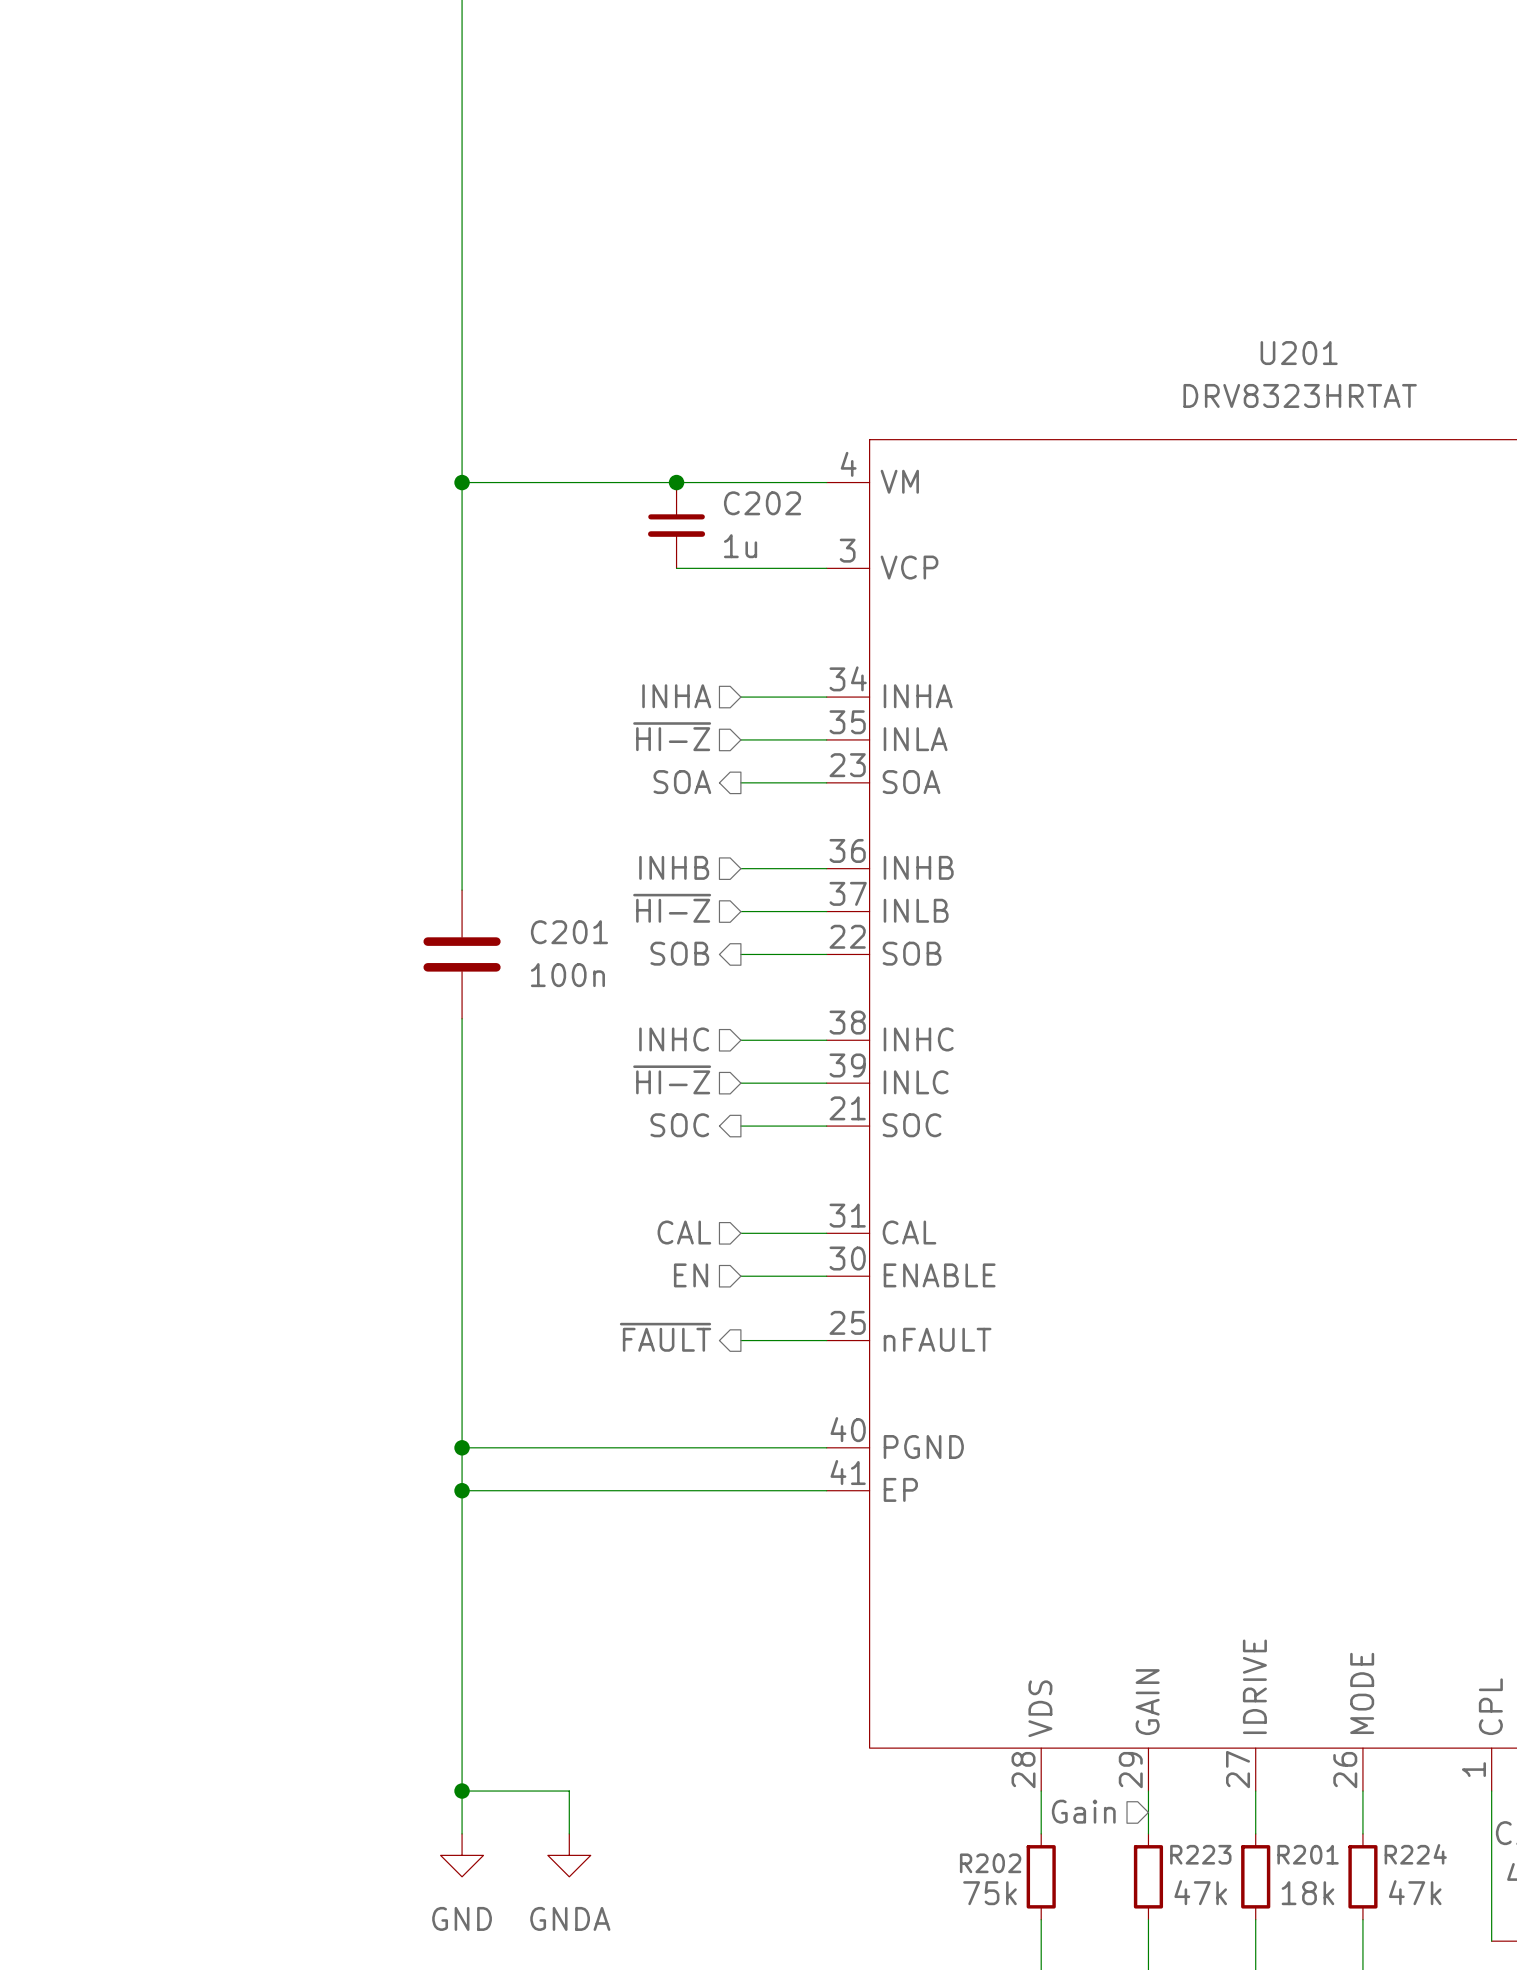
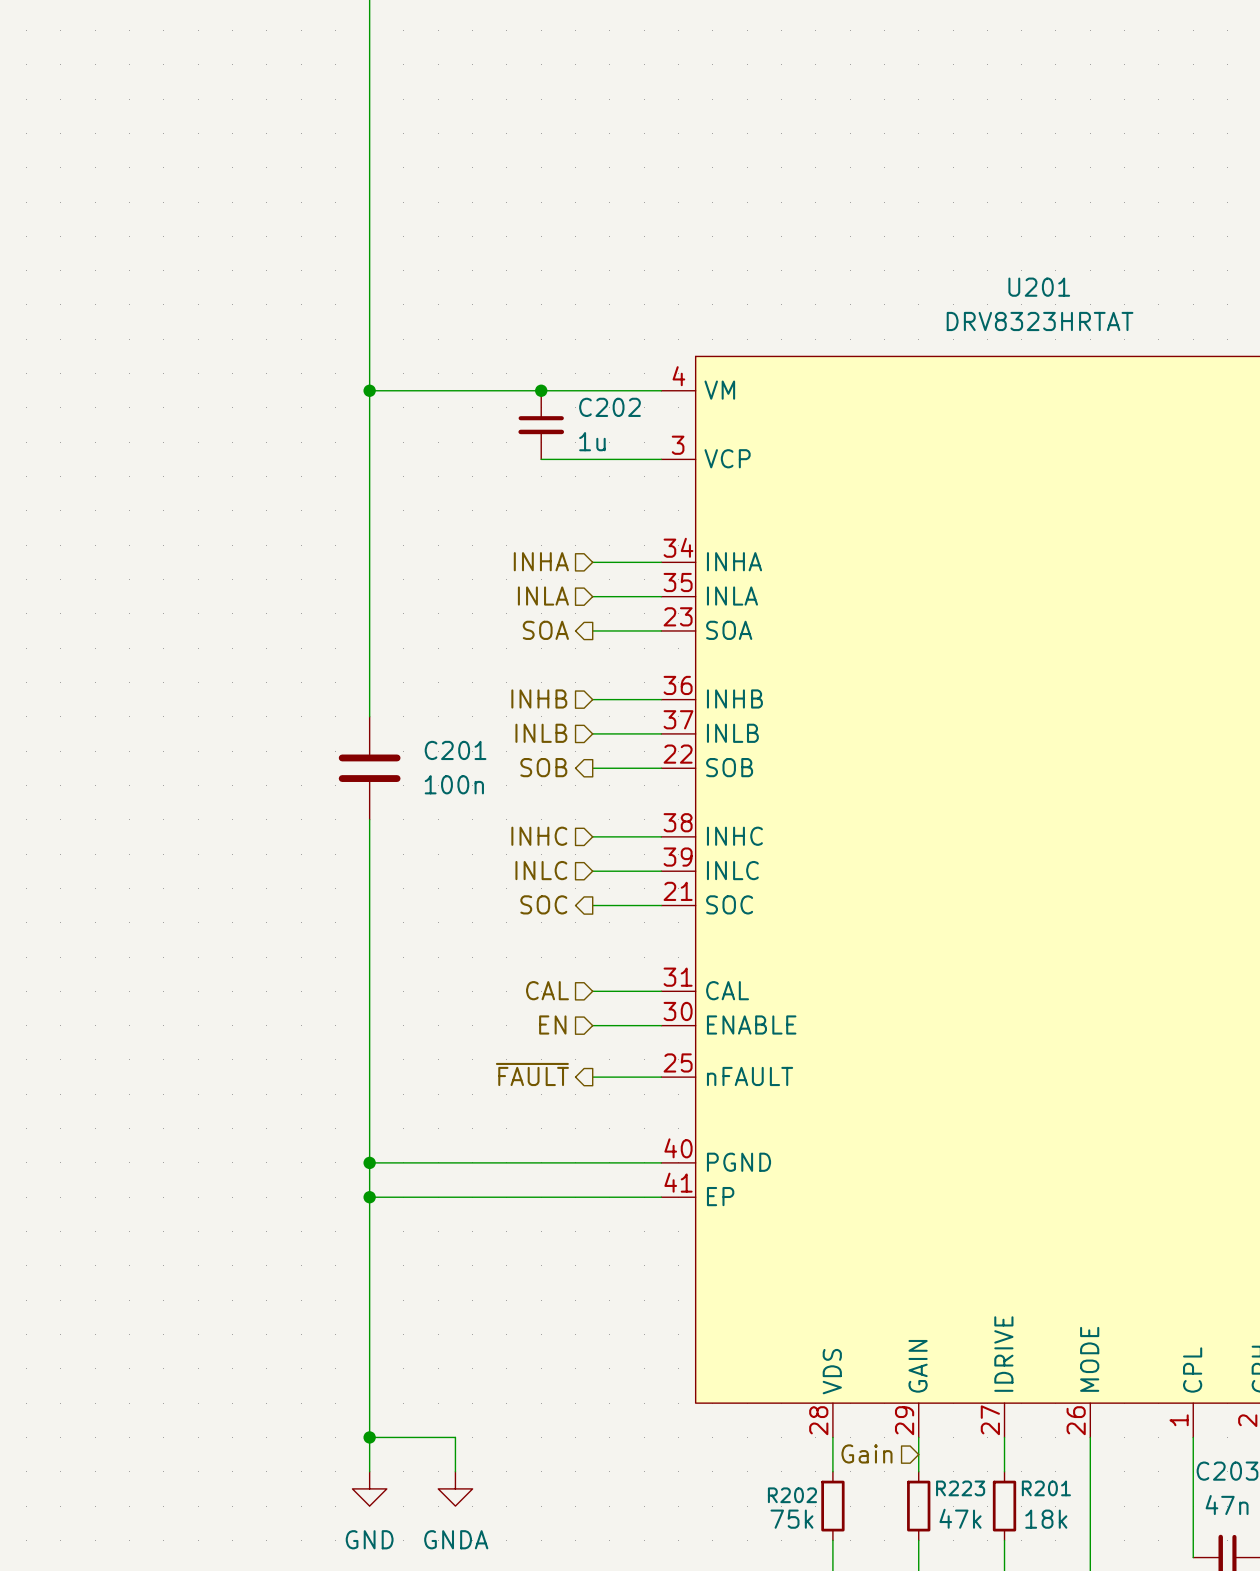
hierarchical label: ~{HI-Z} (672, 736) -> INLA (543, 596)
hierarchical label: ~{HI-Z} (672, 908) -> INLB (541, 733)
hierarchical label: ~{HI-Z} (672, 1079) -> INLC (541, 870)
wire: none -> (1090, 1471) (1090, 1540)
R224: 47k (1362, 1876) -> none

